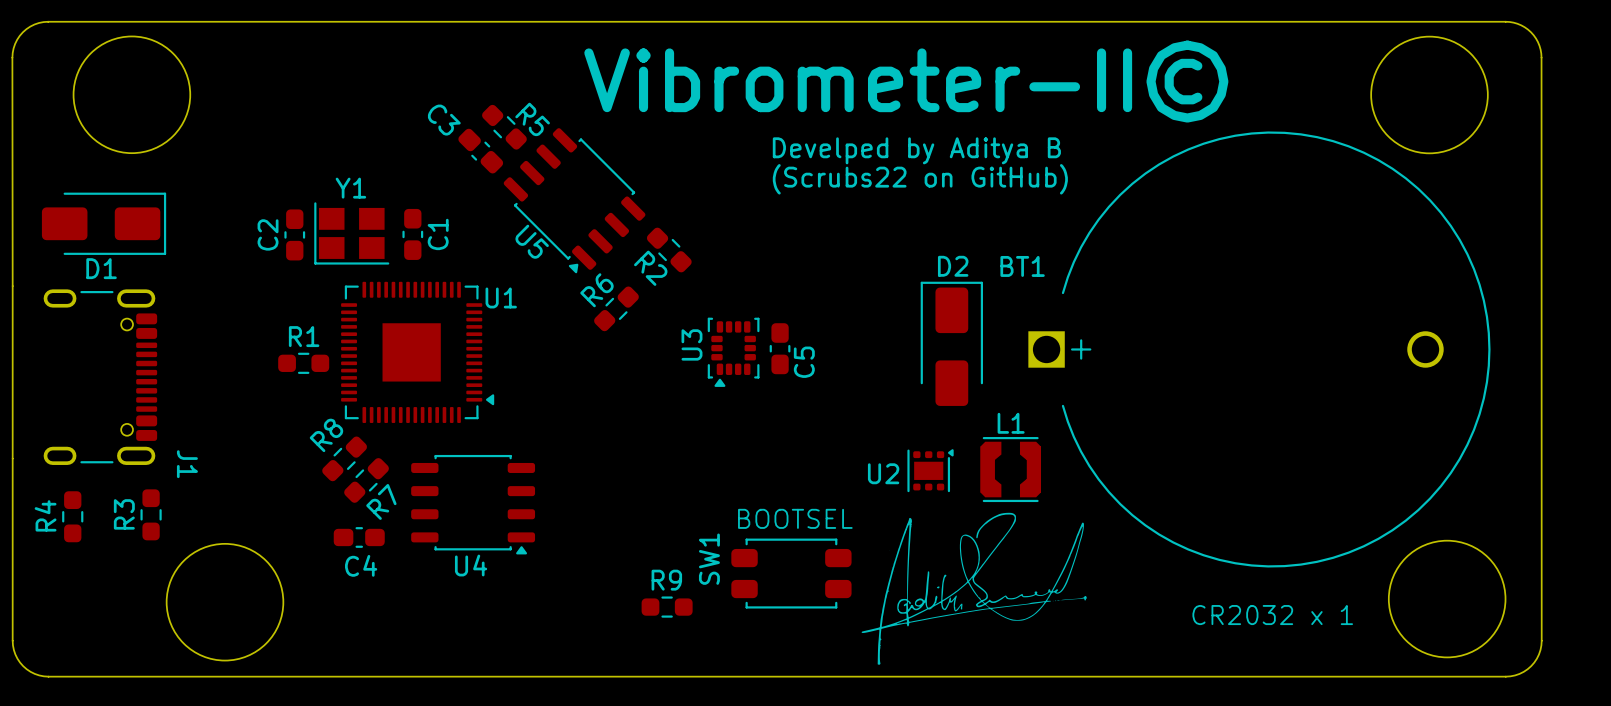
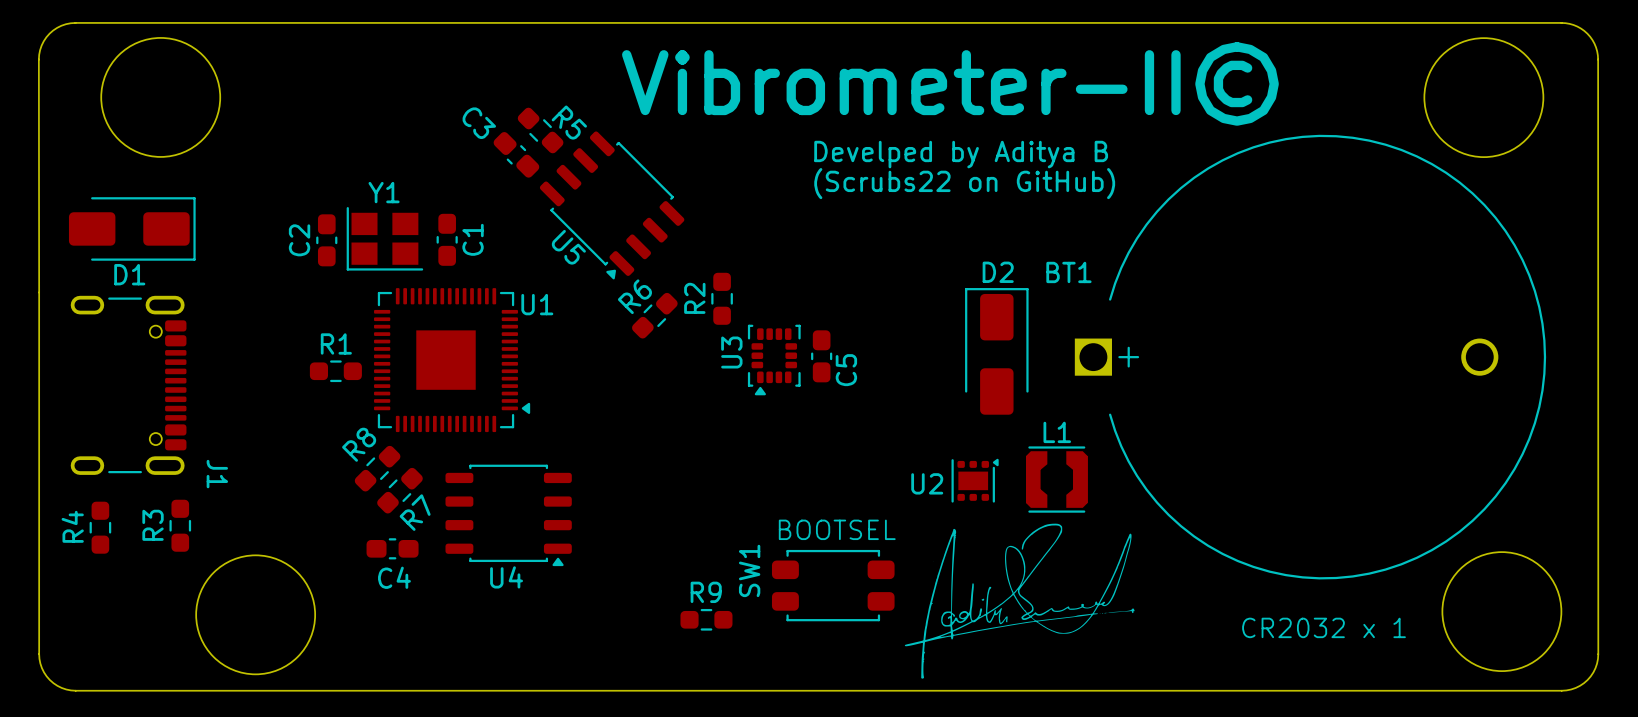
R2 rotation: 0° (669, 250) -> 45° clockwise (722, 298)
R2 position: (669, 250) -> (722, 298)

